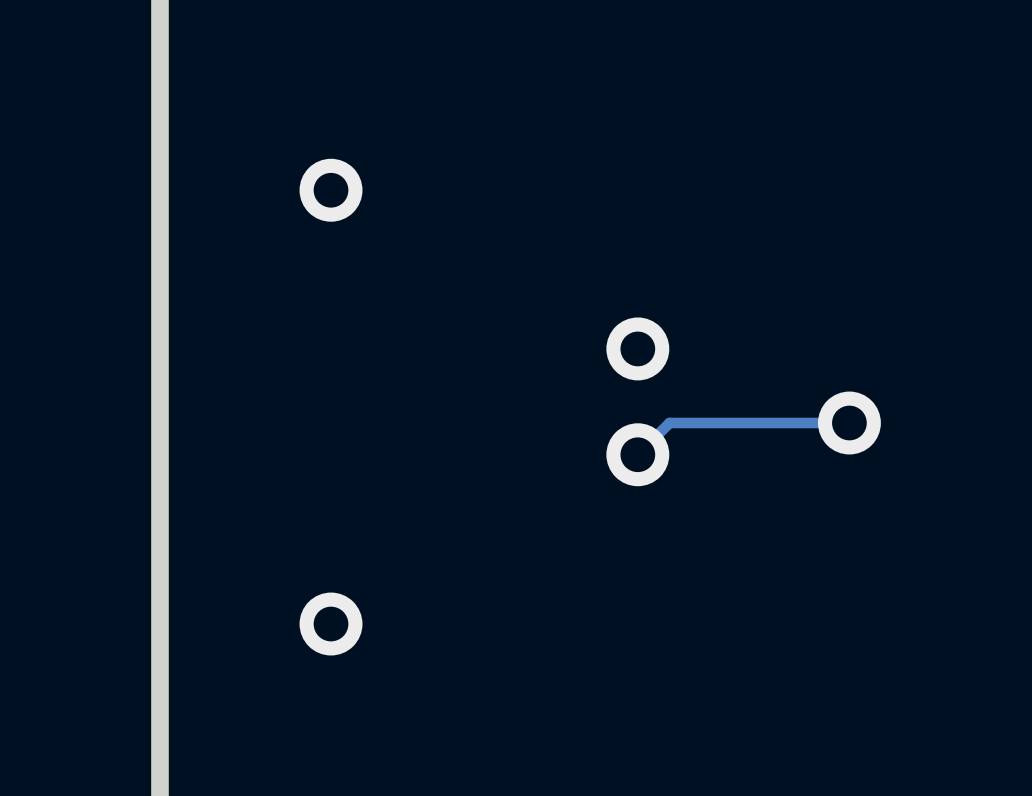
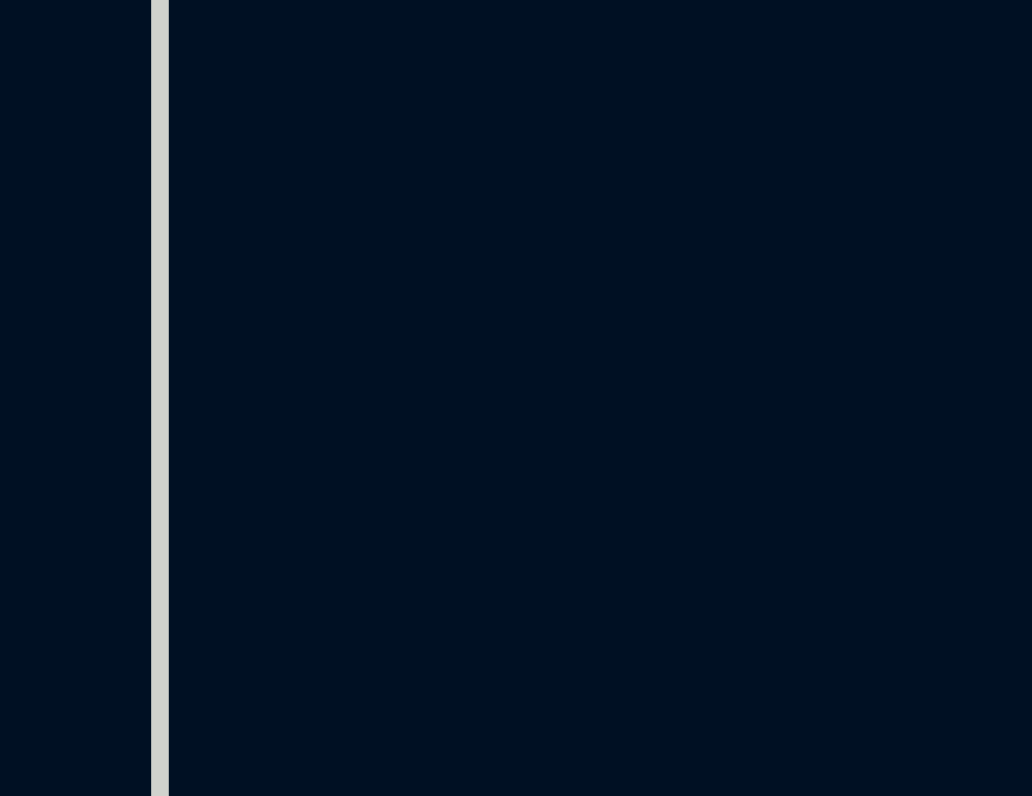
via: (331, 190) -> none
via: (637, 348) -> none
track: (849, 423) (669, 423) (637, 454) -> none
via: (849, 423) -> none
via: (637, 454) -> none
via: (331, 624) -> none

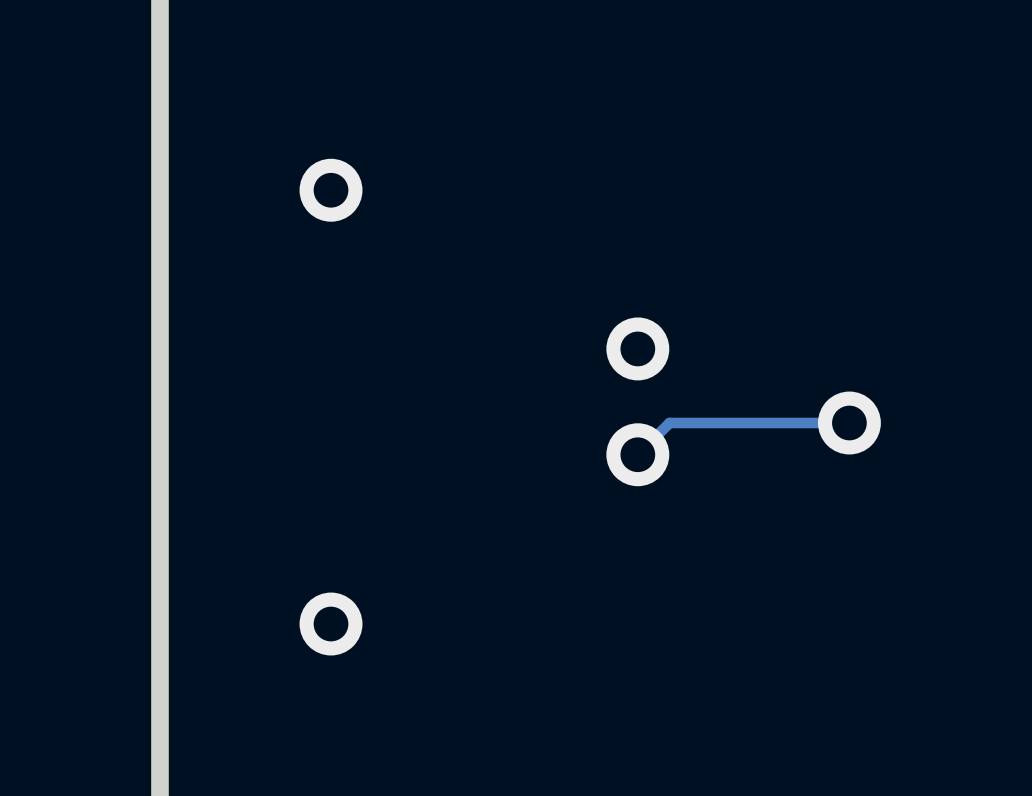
via: none -> (331, 190)
via: none -> (637, 348)
track: none -> (849, 423) (669, 423) (637, 454)
via: none -> (849, 423)
via: none -> (637, 454)
via: none -> (331, 624)

